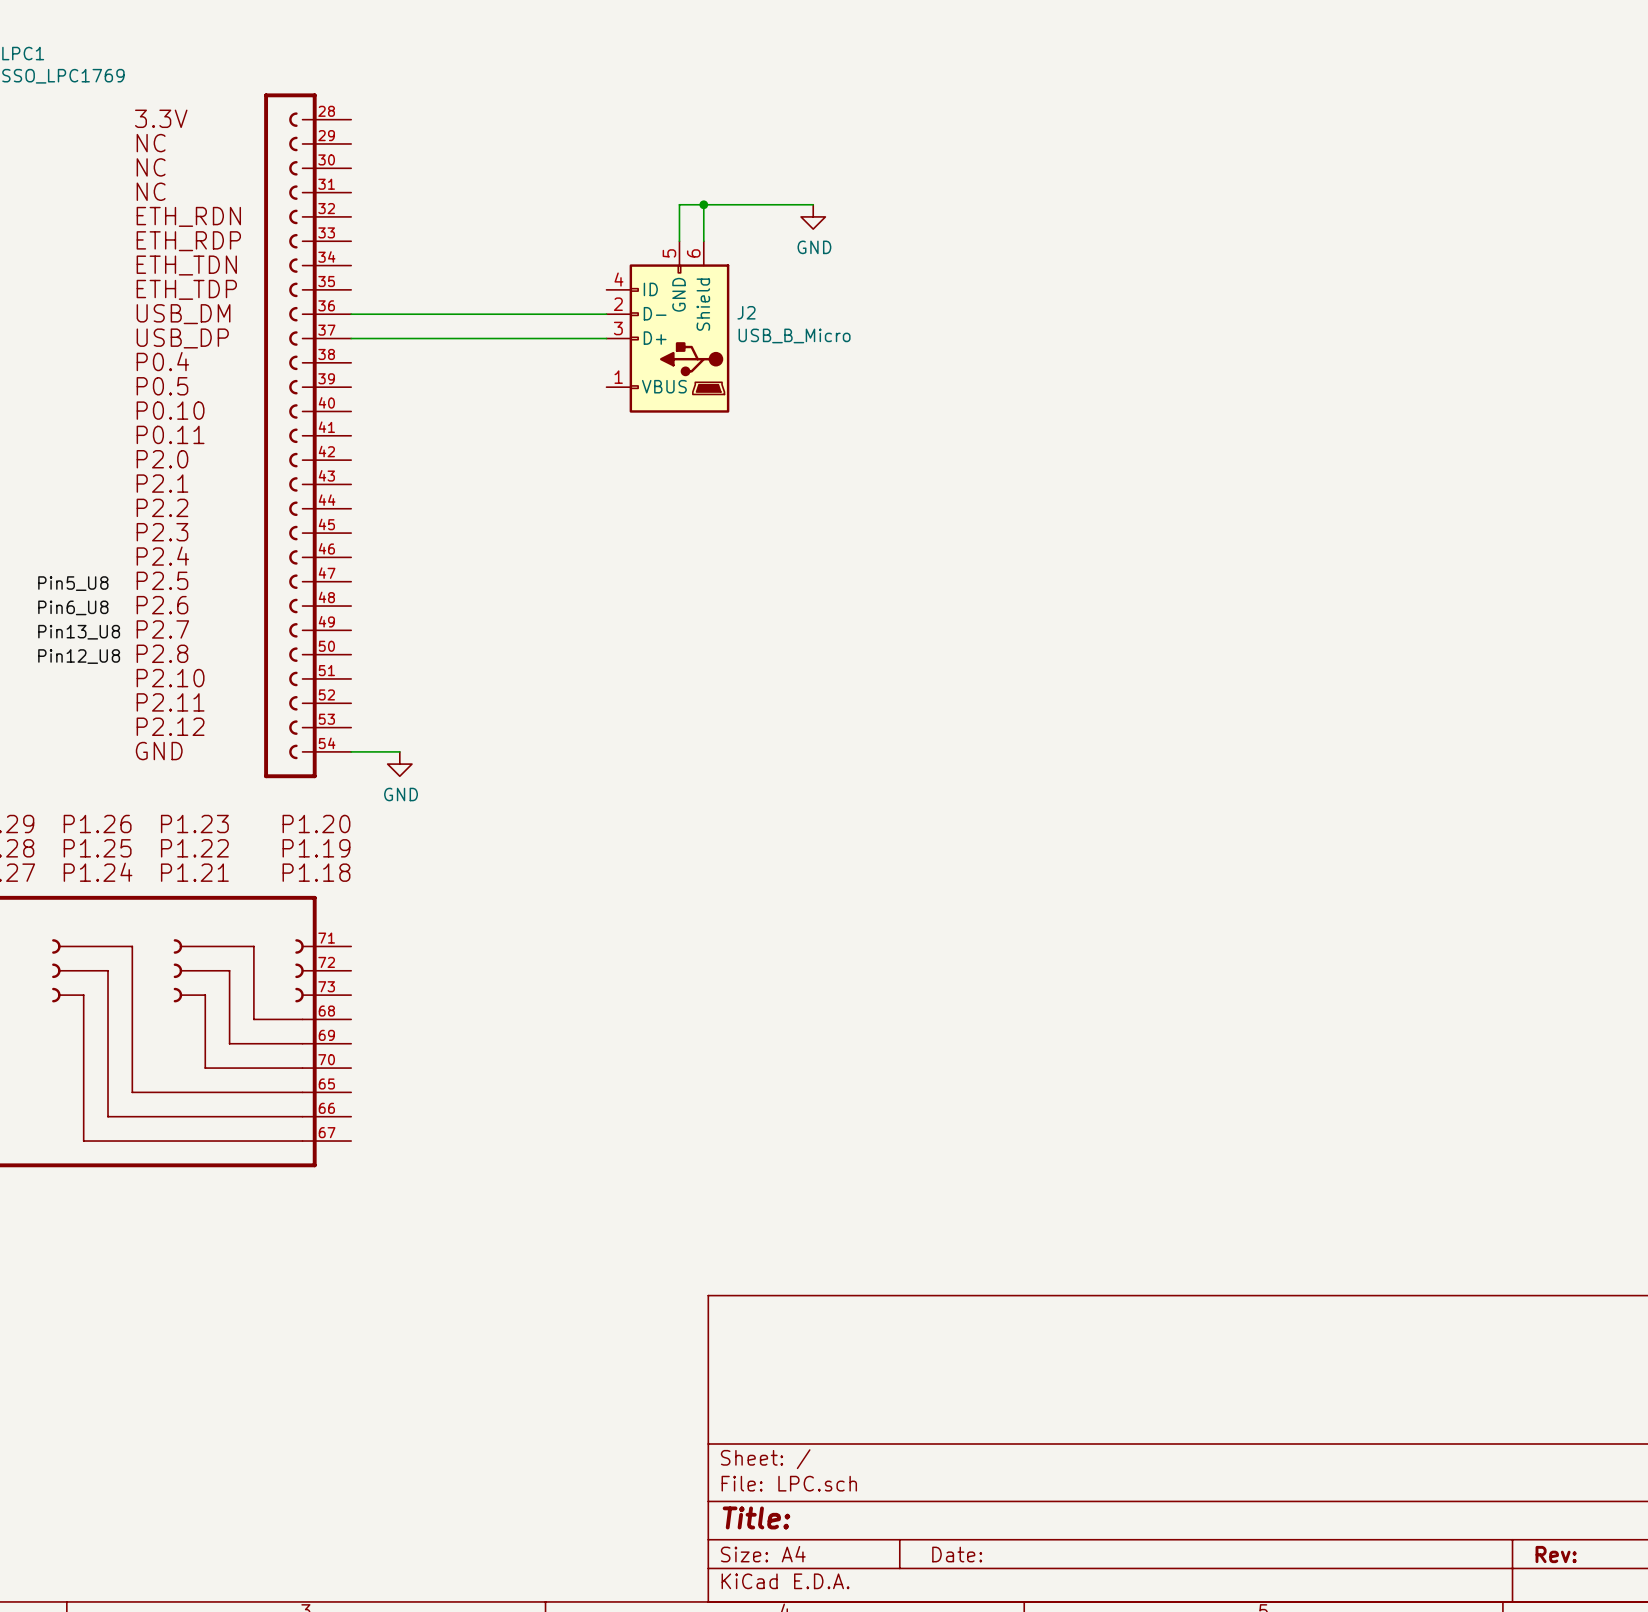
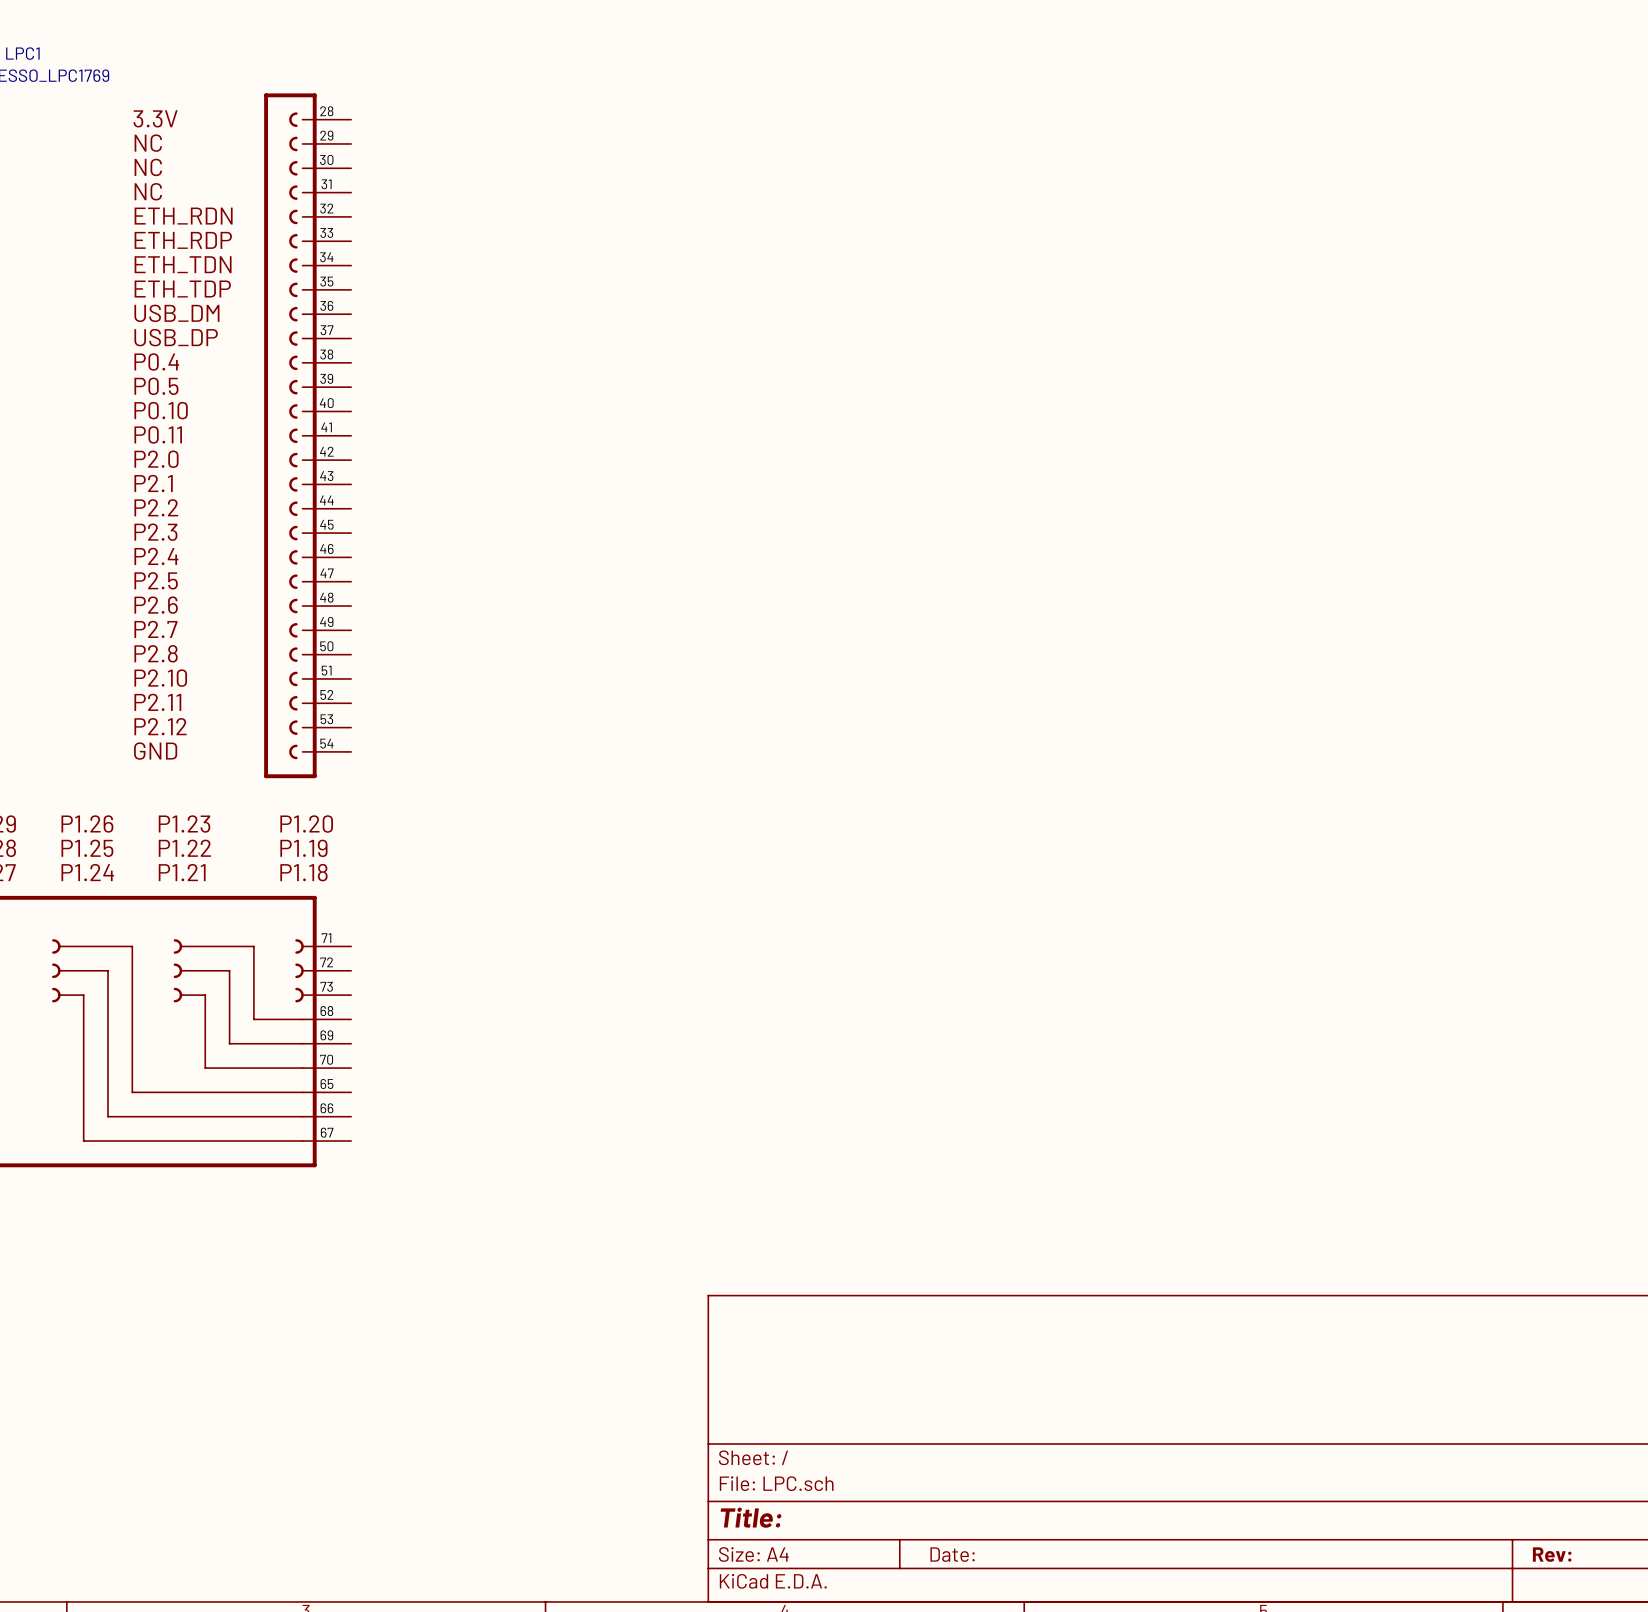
wire: (703, 204) (703, 241) -> none
junction: (703, 204) -> none
wire: (813, 204) (679, 204) (679, 241) -> none
power symbol: GND (813, 216) -> none
wire: (351, 314) (606, 314) -> none
J2: USB_B_Micro (667, 326) -> none
wire: (351, 338) (606, 338) -> none
label: Pin5_U8 (73, 583) -> none
label: Pin6_U8 (73, 607) -> none
label: Pin13_U8 (79, 632) -> none
label: Pin12_U8 (79, 656) -> none
wire: (351, 751) (399, 751) -> none
power symbol: GND (399, 764) -> none

